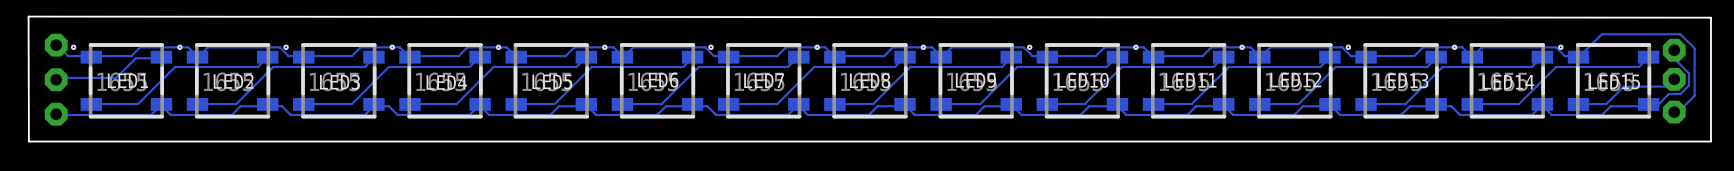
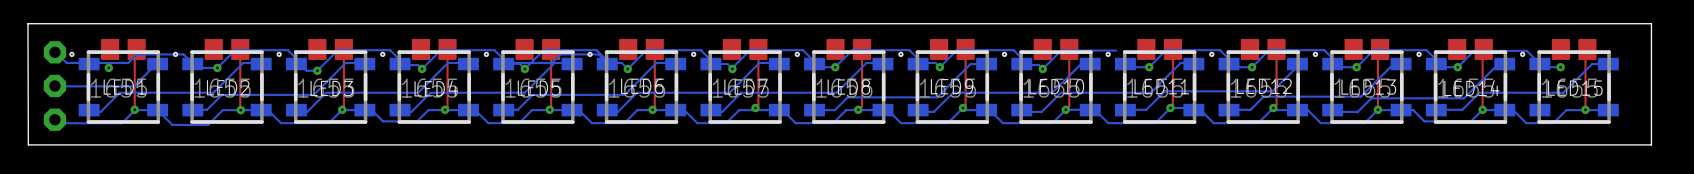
board edge: (28, 16) (1710, 17) (1710, 141) (28, 140) -> (27, 24) (1651, 23) (1651, 144) (28, 144)
part: none -> (123, 49)
top track: none -> (136, 49) (134, 51) (134, 109)
part: none -> (227, 49)
top track: none -> (240, 49) (240, 110)
part: none -> (330, 49)
top track: none -> (343, 49) (343, 108) (342, 109)
part: none -> (434, 49)
top track: none -> (447, 49) (447, 107) (445, 109)
part: none -> (537, 49)
top track: none -> (551, 49) (549, 109)
part: none -> (641, 49)
top track: none -> (654, 49) (654, 107) (652, 109)
part: none -> (745, 49)
top track: none -> (758, 49) (758, 105) (755, 108)
part: none -> (848, 49)
top track: none -> (862, 49) (862, 106) (858, 109)
part: none -> (952, 49)
top track: none -> (965, 49) (965, 105) (962, 108)
part: none -> (1056, 49)
top track: none -> (1069, 49) (1069, 106) (1065, 109)
part: none -> (1159, 49)
top track: none -> (1172, 49) (1172, 105) (1170, 108)
part: none -> (1263, 49)
top track: none -> (1276, 49) (1276, 104) (1273, 108)
part: none -> (1366, 49)
top track: none -> (1380, 49) (1377, 51) (1377, 109)
part: none -> (1470, 49)
top track: none -> (1483, 49) (1482, 109)
part: none -> (1574, 49)
top track: none -> (1587, 49) (1585, 51) (1585, 109)
part: (1674, 50) -> none
bottom track: (1673, 51) (1674, 58) (1688, 73) (1688, 85) (1680, 94) (1668, 94) (1658, 104) (1610, 106) (1601, 114) (1551, 114) (1542, 104) (1532, 114) (1460, 114) (1451, 106) (1438, 106) (1436, 104) (1436, 106) (1409, 106) (1401, 114) (1340, 114) (1329, 104) (1329, 106) (1303, 106) (1294, 114) (1233, 114) (1223, 104) (1222, 106) (1196, 106) (1187, 114) (1126, 114) (1117, 104) (1115, 106) (1089, 106) (1080, 114) (1021, 114) (1011, 104) (1010, 106) (984, 106) (975, 114) (914, 114) (905, 104) (903, 106) (877, 106) (868, 114) (807, 114) (798, 104) (788, 114) (716, 114) (707, 106) (694, 106) (692, 104) (692, 106) (665, 106) (657, 114) (596, 114) (586, 104) (585, 106) (559, 106) (550, 114) (489, 114) (480, 104) (469, 114) (397, 114) (388, 106) (375, 106) (373, 104) (364, 114) (290, 114) (282, 106) (268, 106) (267, 104) (266, 106) (240, 106) (231, 114) (170, 114) (161, 104) (151, 114) (56, 114) -> none
bottom track: (301, 56) (288, 56) (279, 47) (207, 47) (199, 56) -> (294, 62) (294, 56) (287, 50) (235, 50) (217, 67) (196, 67) (193, 64)
bottom track: (408, 56) (399, 47) (360, 47) (351, 56) (303, 56) -> (398, 62) (398, 58) (390, 50) (337, 50) (317, 70) (306, 70) (300, 64) (296, 64)
bottom track: (515, 56) (506, 47) (467, 47) (458, 56) (409, 57) -> (502, 62) (502, 58) (494, 50) (440, 50) (422, 68) (418, 65) (400, 64)
bottom track: (727, 56) (713, 56) (705, 47) (633, 47) (624, 56) -> (709, 62) (709, 58) (700, 50) (646, 50) (627, 68) (621, 62) (609, 62) (596, 50) (543, 50) (524, 68) (519, 63) (504, 63)
bottom track: (729, 56) (777, 56) (785, 47) (825, 47) (834, 57) -> none
bottom track: (836, 56) (884, 56) (892, 47) (932, 47) (941, 57) -> none
bottom track: (1045, 56) (1032, 56) (1023, 47) (951, 47) (943, 56) -> (1020, 62) (1020, 56) (1013, 50) (956, 50) (939, 67) (935, 62) (917, 62) (917, 58) (909, 50) (852, 50) (835, 67) (819, 67) (803, 50) (750, 50) (732, 68) (727, 64) (710, 64)
bottom track: (1152, 56) (1143, 47) (1104, 47) (1095, 56) (1047, 57) -> (1116, 50) (1061, 50) (1042, 68) (1038, 65) (1021, 64)
bottom track: (1259, 56) (1250, 47) (1211, 47) (1202, 56) (1156, 56) -> (1228, 62) (1228, 58) (1220, 50) (1166, 50) (1149, 67) (1132, 67) (1127, 62)
bottom track: (1364, 56) (1351, 56) (1342, 47) (1270, 47) (1261, 56) -> (1330, 62) (1330, 56) (1324, 50) (1269, 50) (1252, 67) (1232, 67) (1229, 64) (1231, 64)
bottom track: (1471, 56) (1462, 47) (1423, 47) (1414, 56) (1367, 56) -> (1435, 62) (1435, 58) (1426, 50) (1373, 50) (1356, 67) (1337, 67) (1333, 62)
bottom track: (161, 57) (135, 58) (116, 77) (57, 77) (56, 79) -> (157, 64) (134, 86) (54, 86)
bottom track: (267, 57) (258, 66) (175, 66) (138, 104) (91, 104) -> (261, 64) (243, 62) (213, 92) (119, 92) (100, 111) (90, 111) (89, 110)
bottom track: (373, 57) (364, 66) (273, 66) (236, 104) (212, 104) -> (364, 64) (345, 62) (313, 94) (221, 94) (207, 109)
bottom track: (480, 57) (469, 66) (388, 66) (351, 104) (303, 104) -> (468, 64) (447, 62) (418, 92) (326, 92) (307, 111) (296, 111) (296, 110)
bottom track: (586, 57) (576, 66) (493, 66) (456, 104) (409, 104) -> (572, 64) (554, 62) (524, 92) (430, 92) (411, 111) (400, 111) (400, 110)
bottom track: (692, 57) (683, 66) (591, 66) (554, 104) (530, 104) -> (675, 64) (656, 62) (624, 94) (532, 94) (517, 109)
bottom track: (798, 57) (788, 66) (698, 66) (661, 104) (622, 104) -> (779, 64) (759, 62) (729, 92) (637, 92) (617, 111) (607, 110)
bottom track: (905, 57) (895, 66) (814, 66) (777, 104) (728, 104) -> (882, 64) (866, 62) (836, 92) (741, 92) (722, 111) (711, 111) (710, 110)
bottom track: (1011, 57) (1001, 66) (910, 66) (873, 104) (834, 104) -> (986, 64) (970, 64) (937, 97) (847, 97) (834, 110) (814, 110)
bottom track: (1117, 57) (1106, 66) (1017, 66) (980, 104) (941, 104) -> (1090, 64) (1082, 62) (1052, 92) (953, 92) (933, 111) (920, 111) (918, 110)
bottom track: (1223, 57) (1213, 66) (1121, 66) (1084, 104) (1047, 104) -> (1193, 64) (1180, 62) (1150, 92) (1060, 92) (1041, 111) (1022, 111) (1021, 110)
bottom track: (1329, 57) (1320, 66) (1228, 66) (1191, 104) (1175, 104) -> (1297, 64) (1297, 66) (1272, 91) (1164, 91) (1146, 109)
bottom track: (1436, 57) (1427, 66) (1335, 66) (1298, 104) (1281, 104) -> (1401, 64) (1393, 64) (1360, 96) (1263, 96) (1250, 109)
bottom track: (1472, 57) (1481, 47) (1556, 47) (1564, 56) (1578, 57) (1601, 34) (1680, 34) (1694, 48) (1694, 95) (1678, 112) (1674, 112) -> (1436, 64) (1438, 67) (1457, 67) (1474, 50) (1526, 50) (1543, 67) (1560, 67)
bottom track: (1542, 57) (1532, 66) (1442, 66) (1405, 104) (1366, 104) -> (1505, 62) (1498, 64) (1464, 98) (1371, 98) (1357, 111) (1332, 111) (1332, 110)
bottom track: (1648, 57) (1639, 66) (1556, 66) (1519, 104) (1499, 104) -> (1608, 64) (1592, 64) (1563, 92) (1479, 92) (1462, 109)
via: none -> (835, 67)
via: none -> (939, 67)
via: none -> (1149, 67)
via: none -> (1252, 67)
via: none -> (1356, 67)
via: none -> (1457, 67)
via: none -> (1560, 67)
via: none -> (108, 67)
via: none -> (217, 67)
via: none -> (422, 68)
via: none -> (524, 68)
via: none -> (627, 68)
via: none -> (732, 68)
via: none -> (1042, 68)
via: none -> (317, 70)
bottom track: (1674, 79) (1667, 86) (1623, 86) (1606, 104) (1578, 104) -> none
part: (1674, 79) -> none
via: none -> (755, 108)
via: none -> (962, 108)
via: none -> (1170, 108)
via: none -> (1273, 108)
via: none -> (134, 109)
via: none -> (240, 110)
via: none -> (342, 109)
via: none -> (445, 109)
via: none -> (549, 109)
via: none -> (652, 109)
via: none -> (858, 109)
via: none -> (1065, 109)
via: none -> (1377, 109)
via: none -> (1482, 109)
via: none -> (1585, 109)
bottom track: none -> (1608, 110) (1566, 110) (1553, 123) (1526, 123) (1513, 110) (1482, 109) (1471, 121) (1424, 121) (1413, 110) (1377, 109) (1364, 123) (1320, 123) (1307, 110) (1275, 110) (1273, 108) (1258, 123) (1213, 123) (1200, 110) (1193, 110) (1191, 108) (1170, 108) (1155, 123) (1108, 123) (1095, 110) (1089, 109) (1065, 109) (1052, 123) (1002, 123) (989, 110) (965, 110) (962, 108) (947, 123) (901, 123) (888, 110) (846, 110) (833, 123) (795, 123) (782, 110) (739, 110) (726, 123) (697, 123) (684, 110) (637, 110) (624, 123) (591, 123) (578, 110) (532, 110) (519, 123) (488, 123) (475, 110) (428, 110) (417, 121) (382, 121) (371, 110) (342, 109) (328, 123) (281, 123) (268, 110) (222, 110) (208, 124) (172, 124) (157, 110) (135, 110) (121, 123) (60, 123) (54, 117)
part: (1674, 112) -> none

